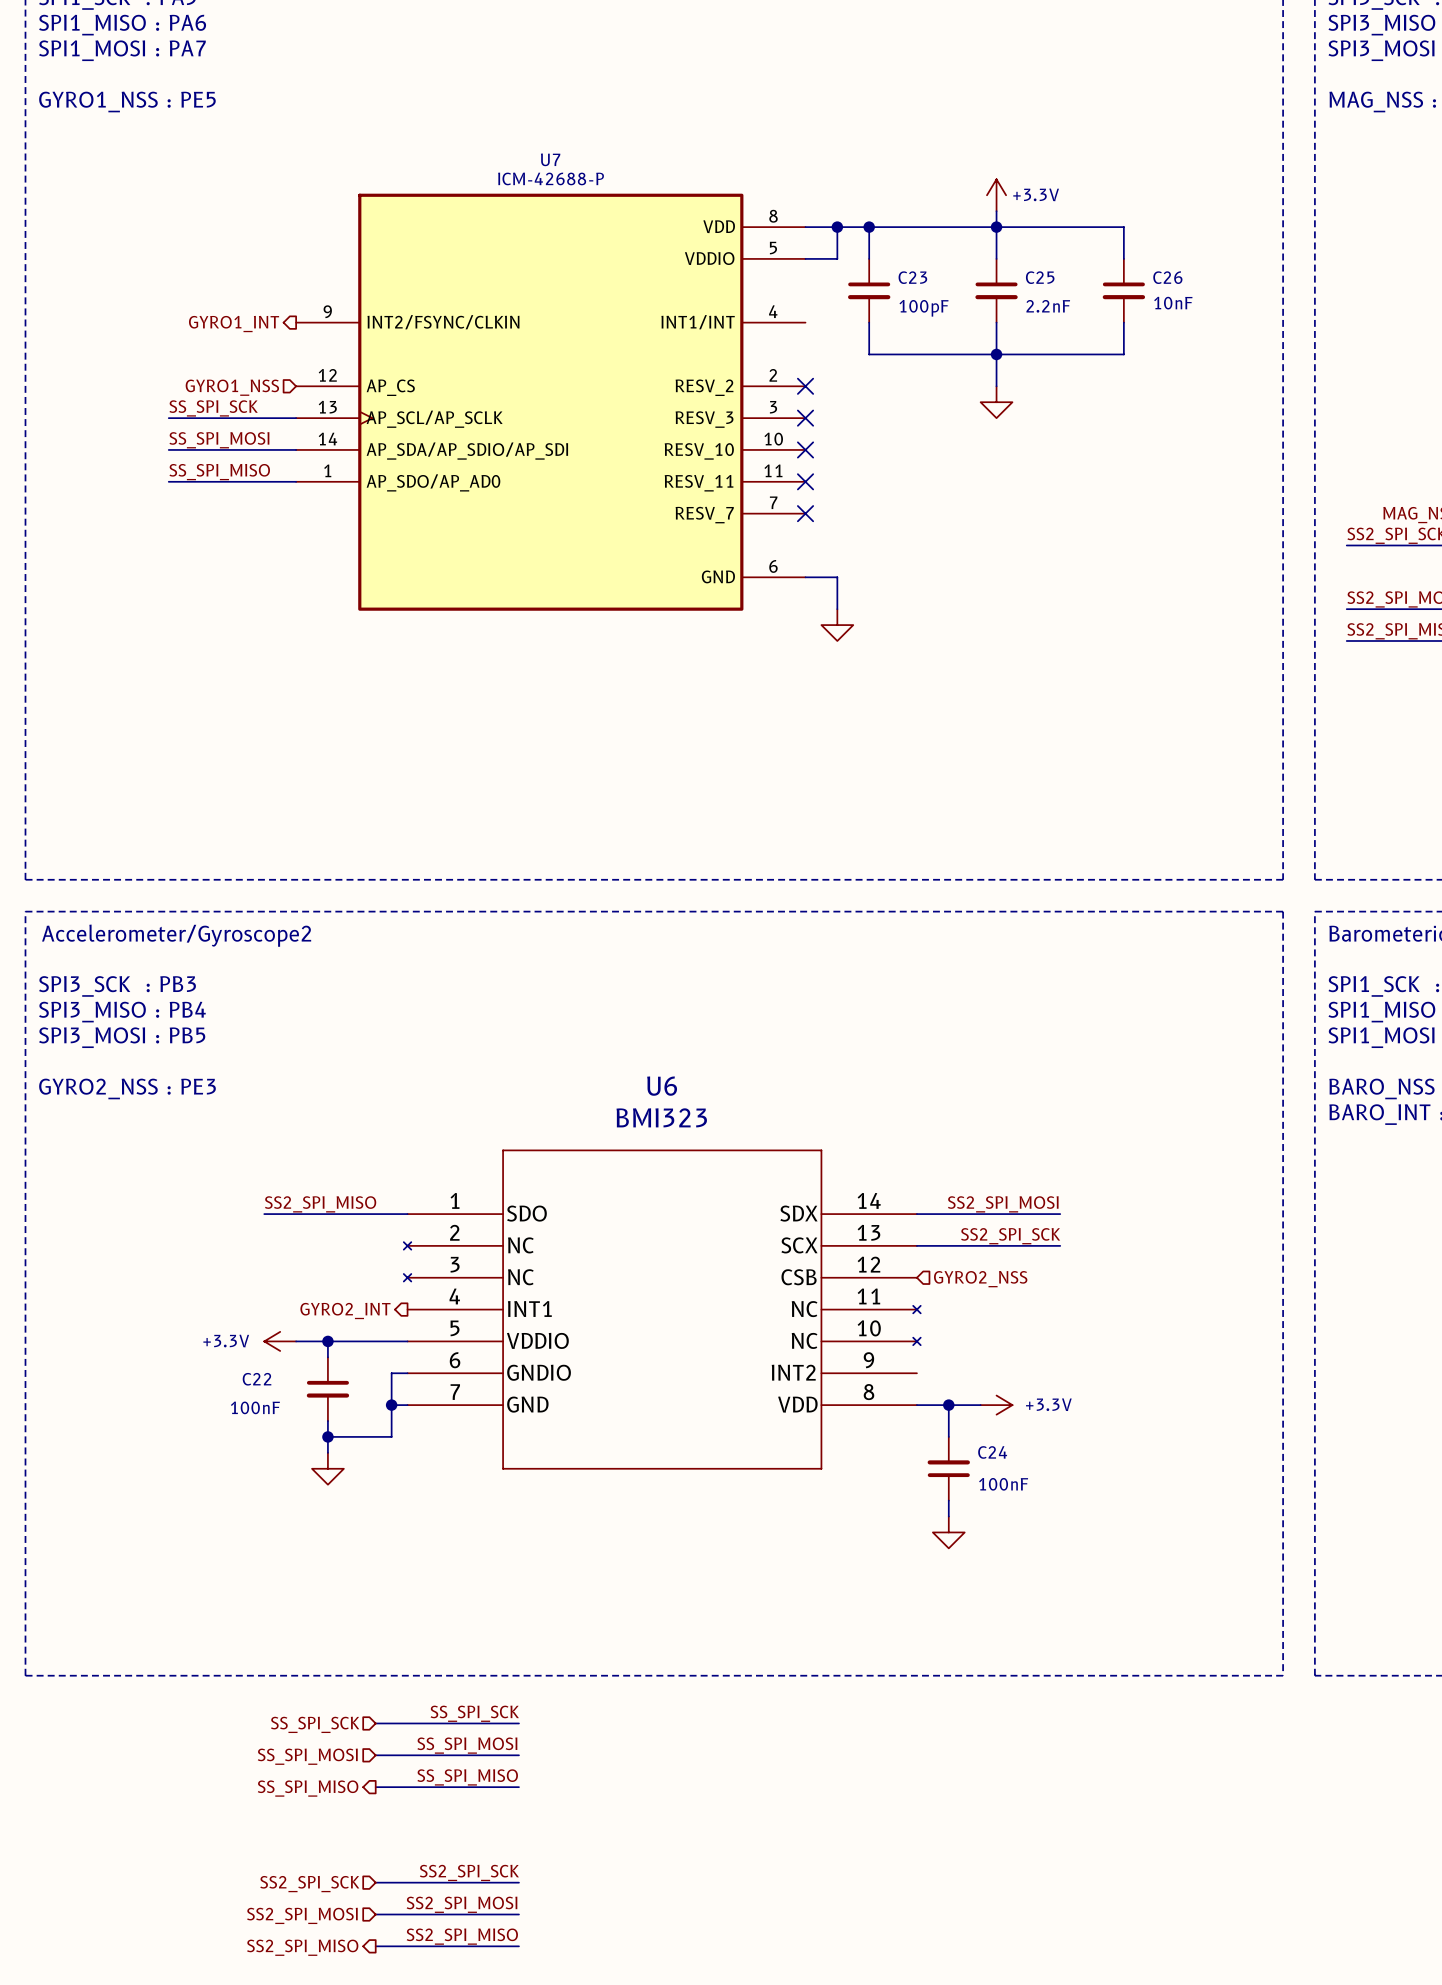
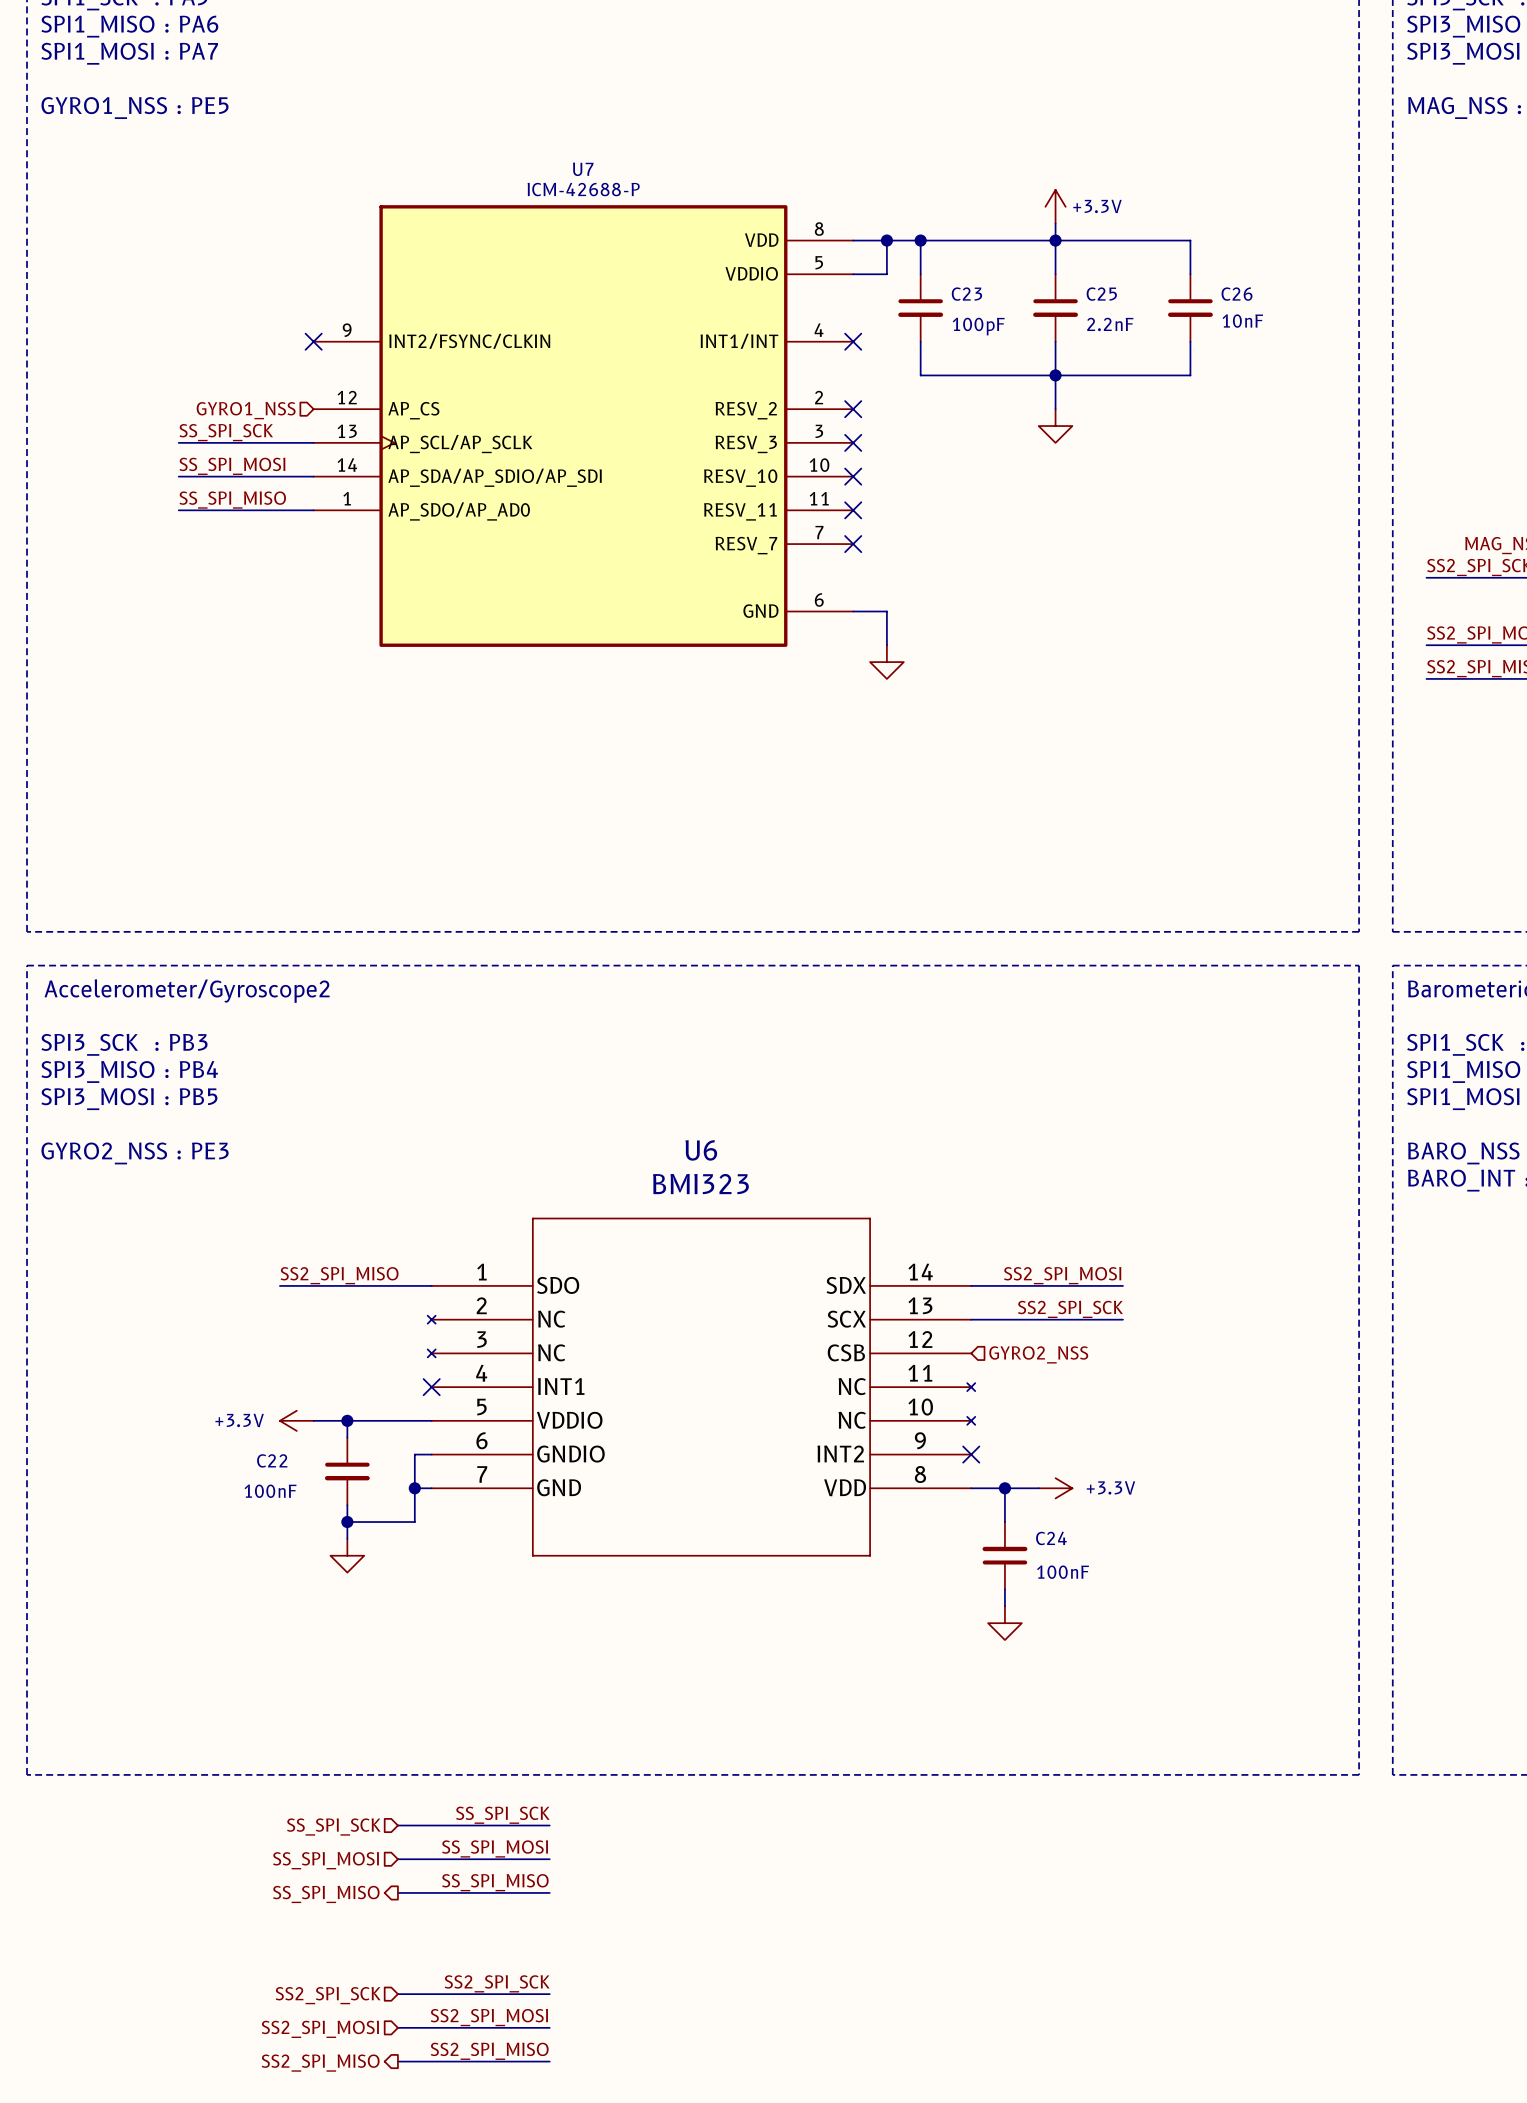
no-connect mark: none -> (313, 341)
no-connect mark: none -> (853, 341)
hierarchical label: GYRO1_INT (234, 324) -> none
no-connect mark: none -> (431, 1387)
hierarchical label: GYRO2_INT (345, 1310) -> none
no-connect mark: none -> (971, 1454)

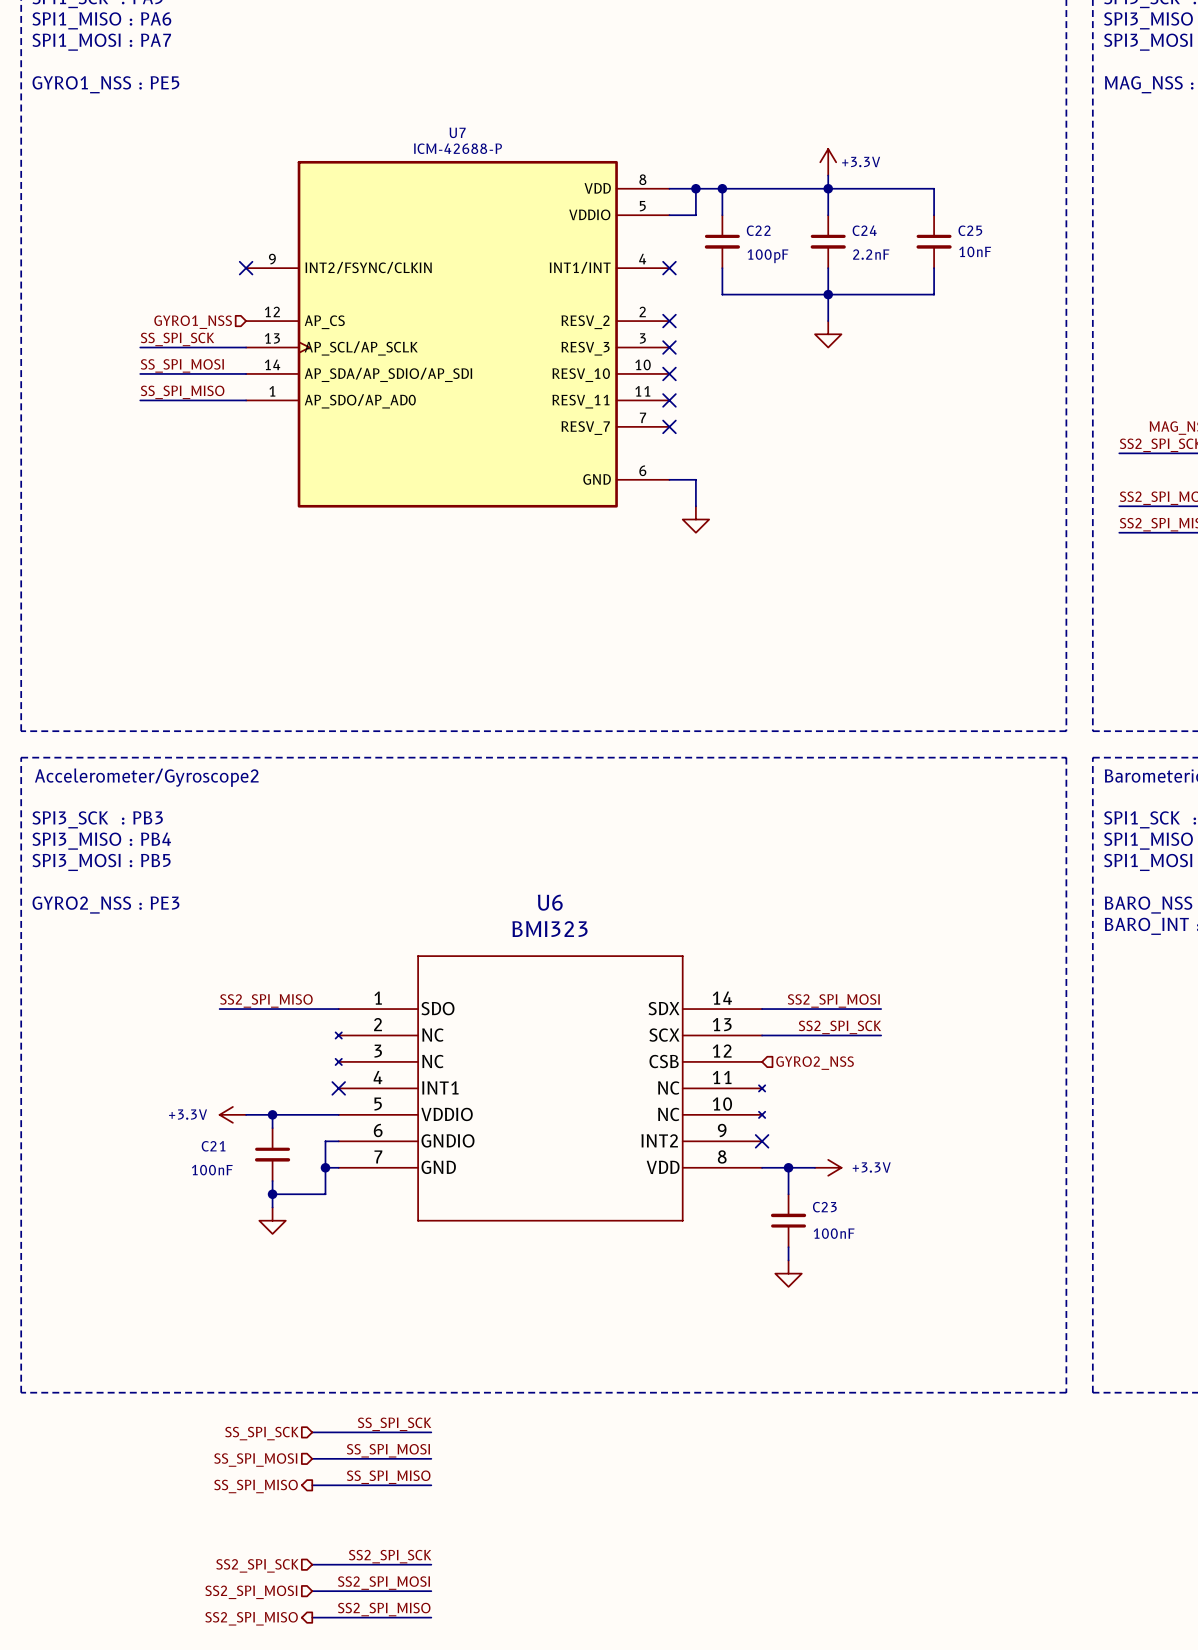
C23 name: C23 (966, 294) -> C22 (758, 230)
C25 name: C25 (1101, 294) -> C24 (864, 230)
C26 name: C26 (1237, 294) -> C25 (970, 230)
C22 name: C22 (272, 1460) -> C21 (213, 1146)
C24 name: C24 (1051, 1538) -> C23 (824, 1207)

